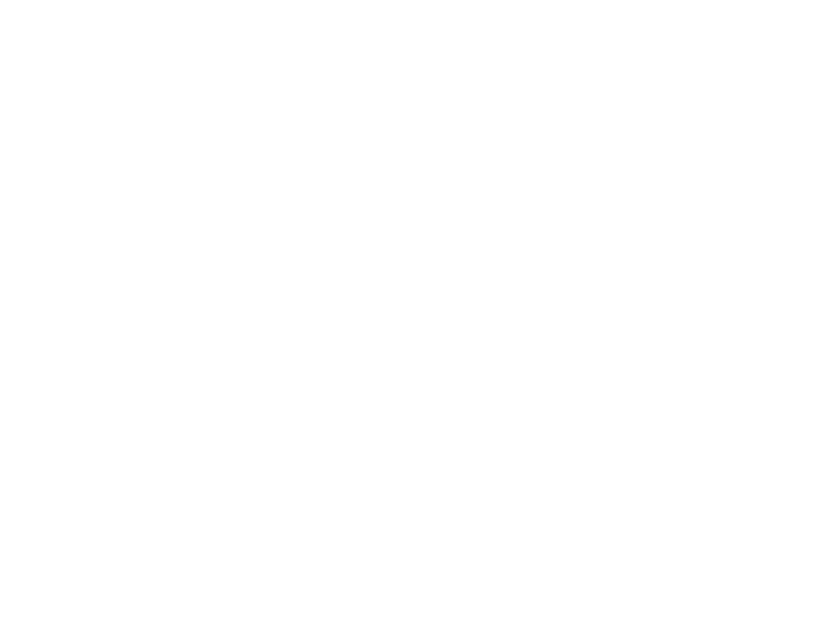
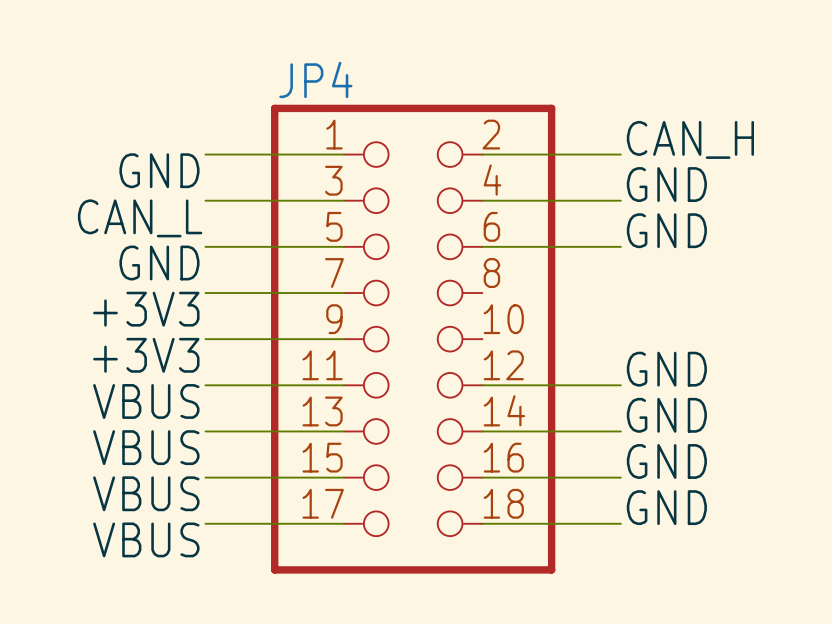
label: none -> CAN_H (690, 139)
wire: none -> (205, 154) (343, 154)
wire: none -> (482, 154) (620, 154)
label: none -> GND (159, 170)
label: none -> GND (666, 184)
wire: none -> (205, 200) (343, 200)
wire: none -> (482, 200) (620, 200)
label: none -> CAN_L (140, 218)
label: none -> GND (666, 230)
wire: none -> (205, 246) (343, 246)
wire: none -> (482, 246) (620, 246)
label: none -> GND (159, 263)
wire: none -> (205, 293) (343, 293)
label: none -> +3V3 (146, 309)
wire: none -> (205, 339) (343, 339)
JP4: none -> (413, 339)
label: none -> +3V3 (146, 355)
label: none -> GND (666, 369)
wire: none -> (205, 385) (343, 385)
wire: none -> (482, 385) (620, 385)
label: none -> VBUS (146, 401)
label: none -> GND (666, 415)
wire: none -> (205, 431) (343, 431)
wire: none -> (482, 431) (620, 431)
label: none -> VBUS (146, 447)
label: none -> GND (666, 461)
wire: none -> (205, 477) (343, 477)
wire: none -> (482, 477) (620, 477)
label: none -> VBUS (146, 493)
label: none -> GND (666, 507)
wire: none -> (205, 523) (343, 523)
wire: none -> (482, 523) (620, 523)
label: none -> VBUS (146, 539)

